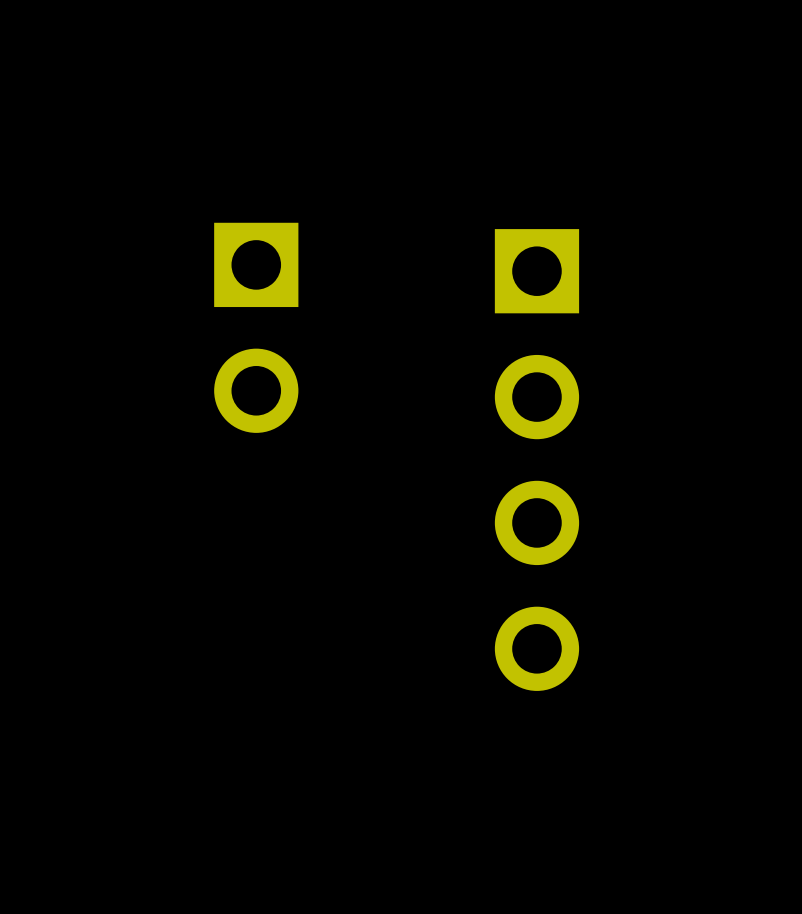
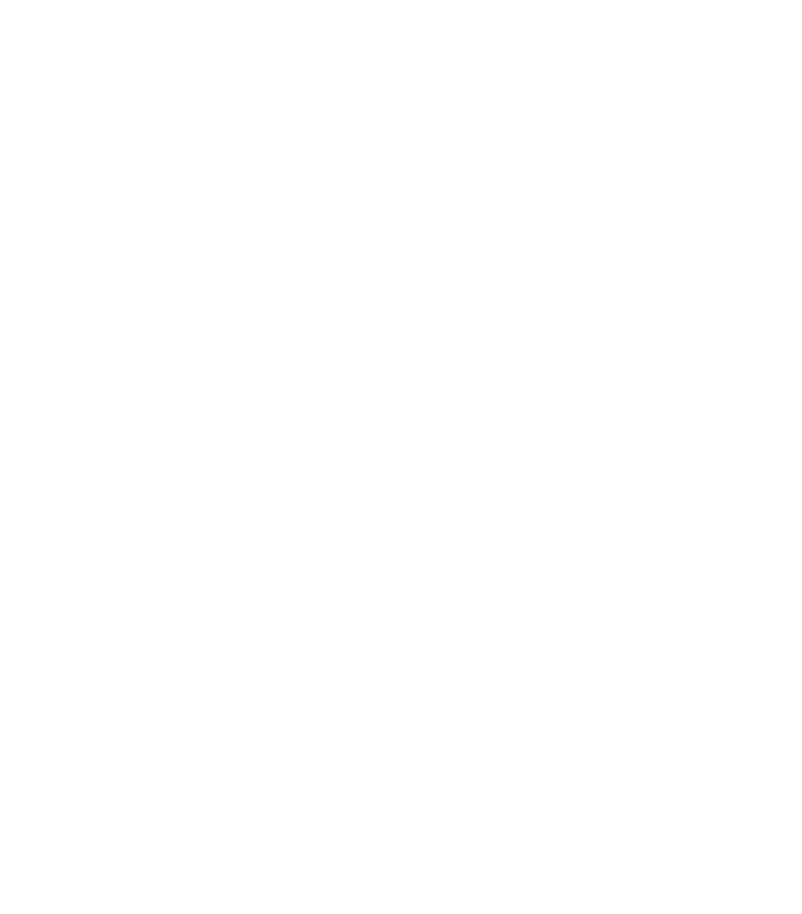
part: (256, 327) -> none
part: (536, 460) -> none

